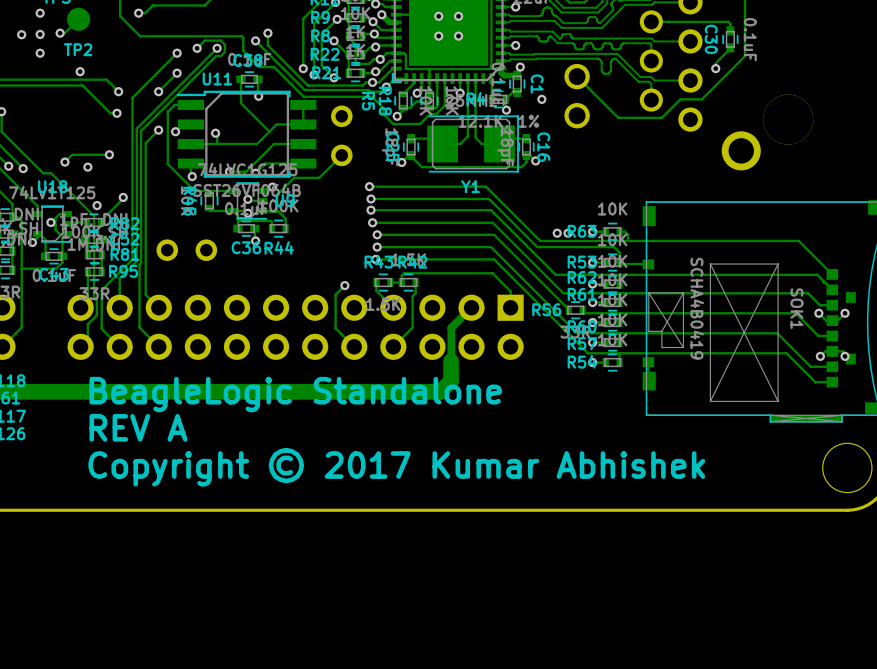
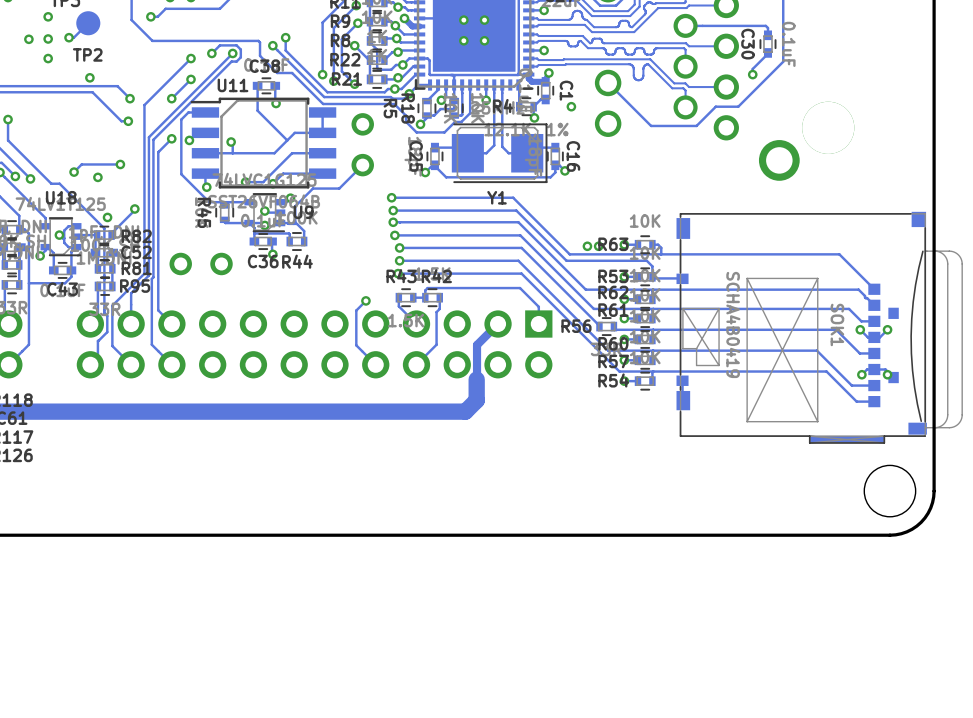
text: BeagleLogic Standalone (295, 394) -> none
text: REV A (138, 427) -> none
text: Copyright © 2017 Kumar Abhishek (396, 467) -> none

